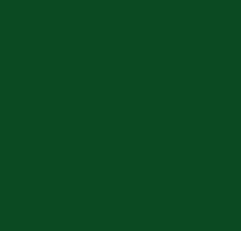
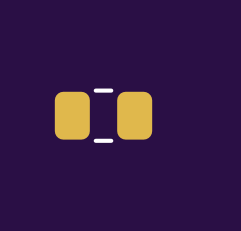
part: none -> (103, 115)

